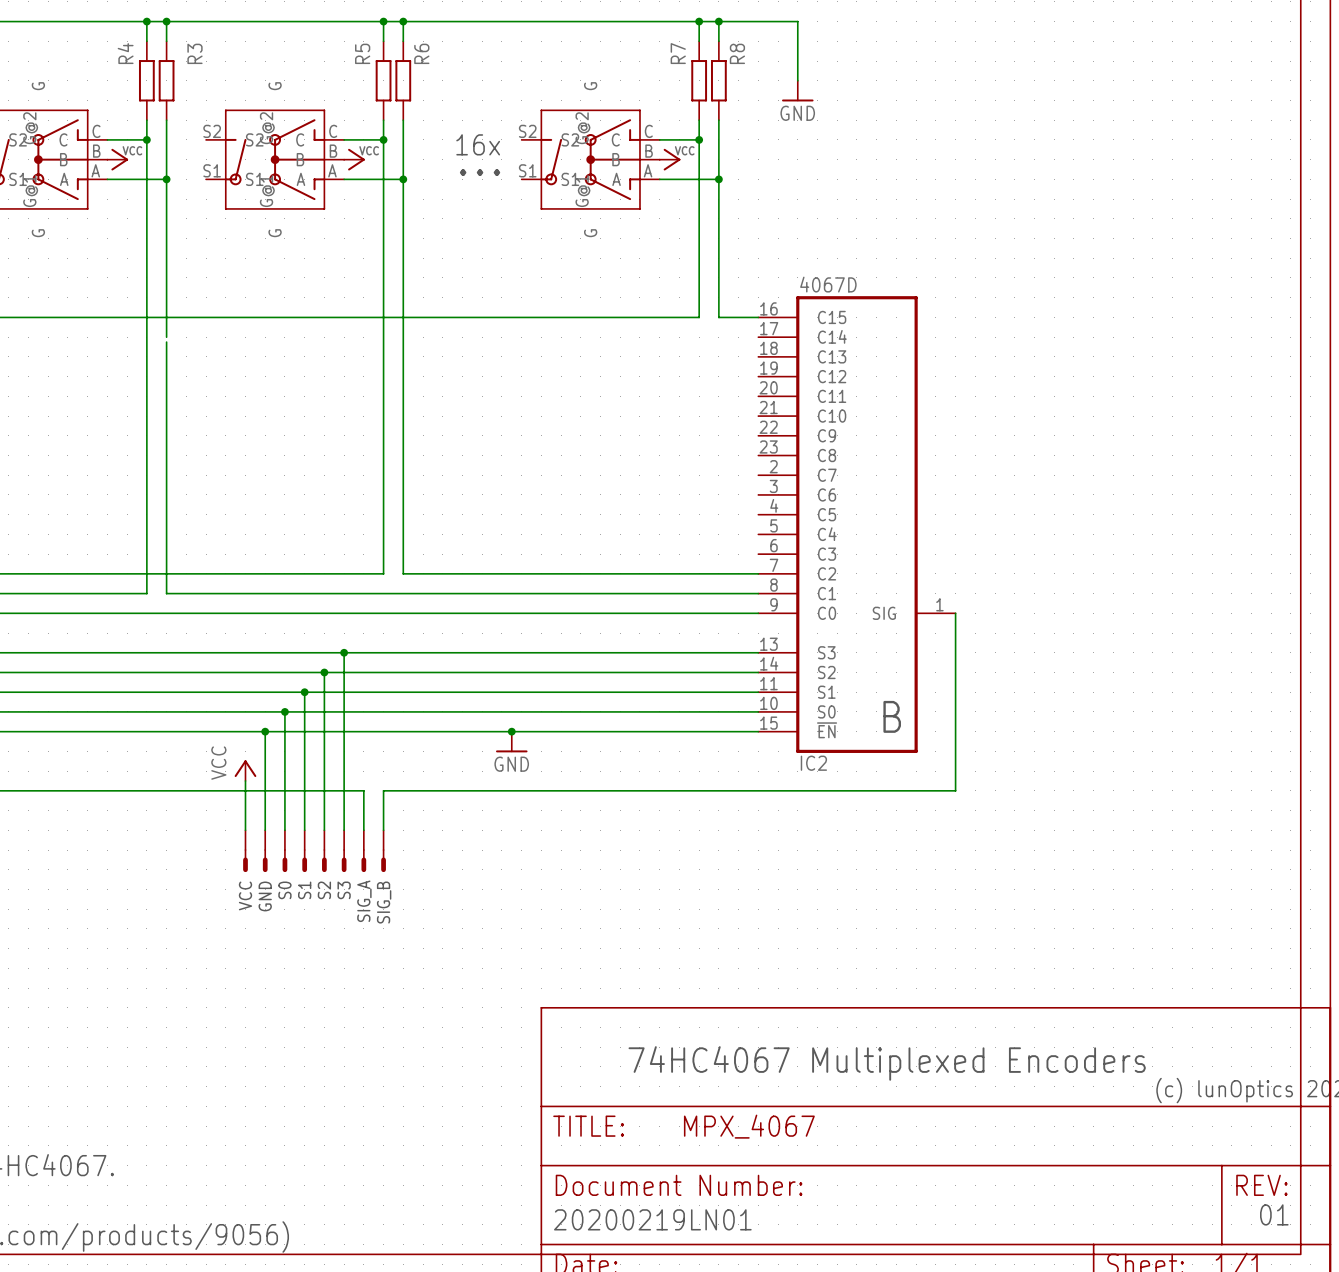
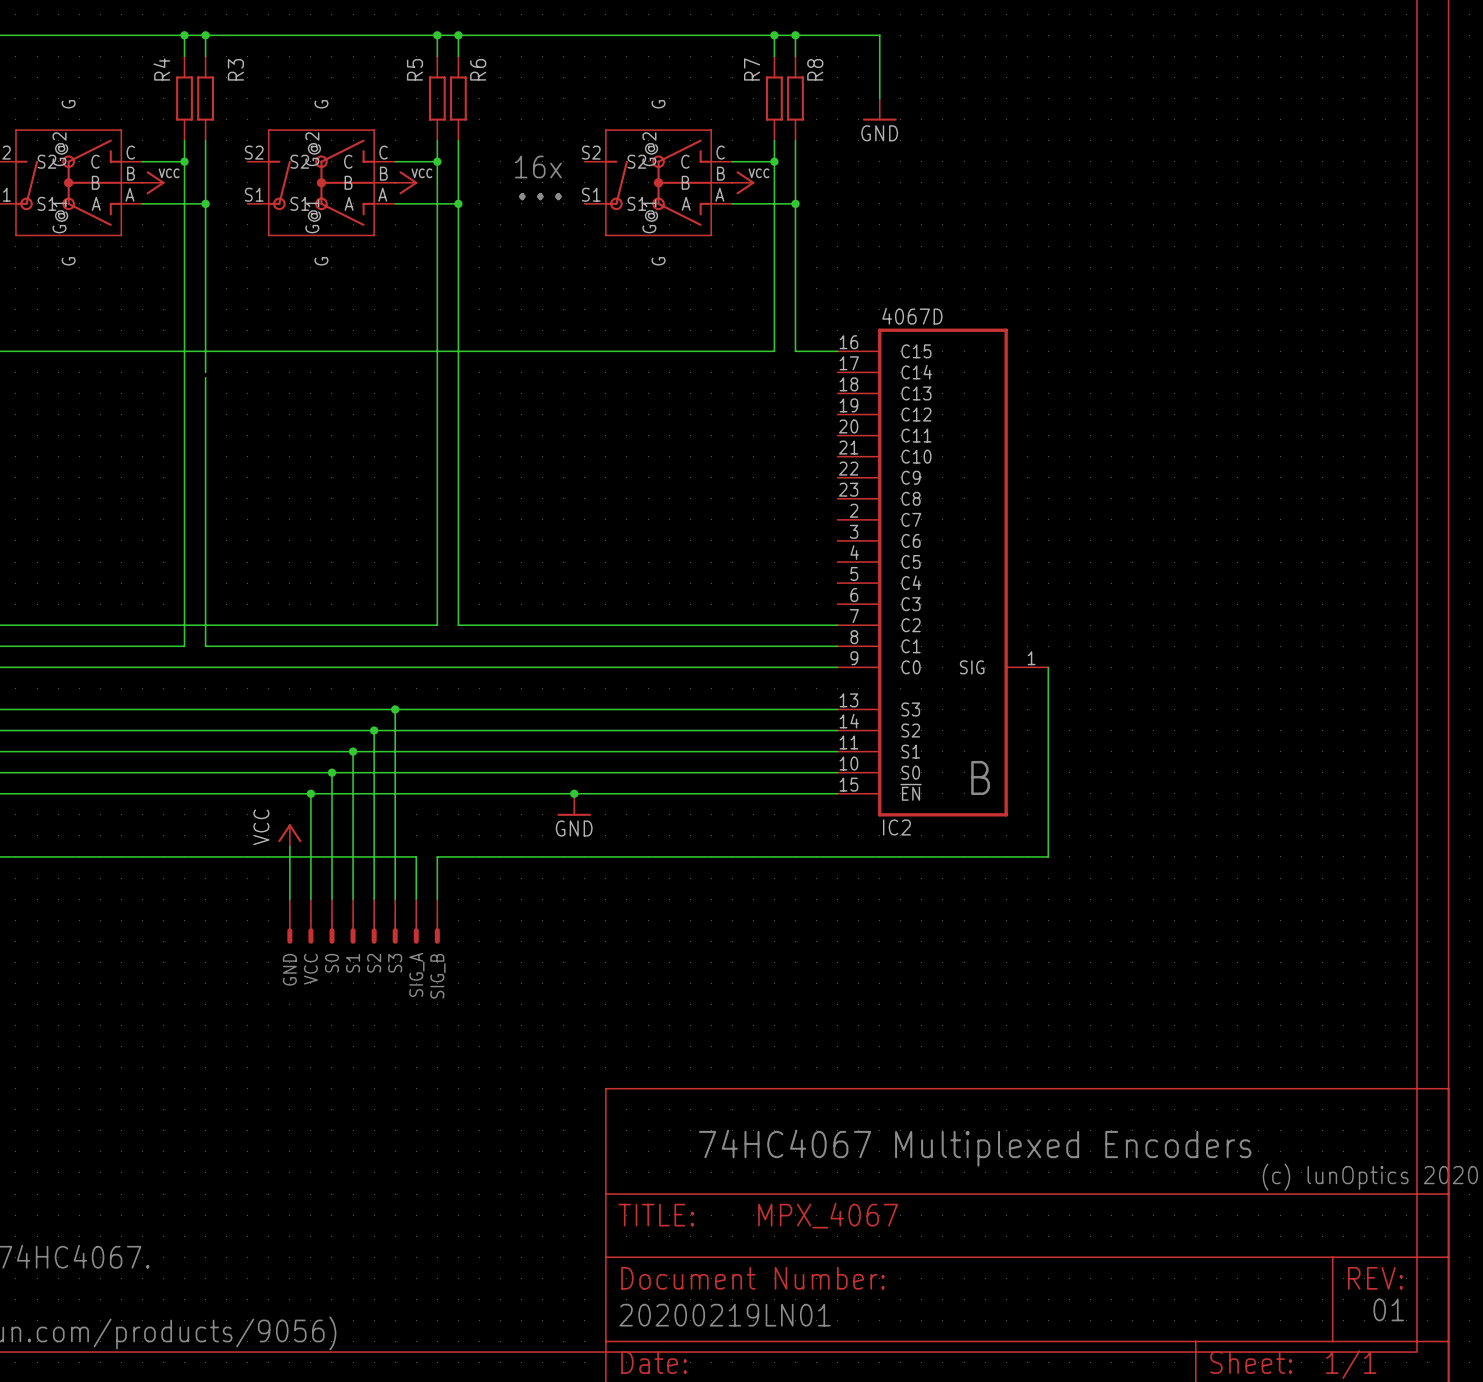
text: VCC (245, 895) -> GND (289, 969)
text: GND (265, 896) -> VCC (310, 969)

